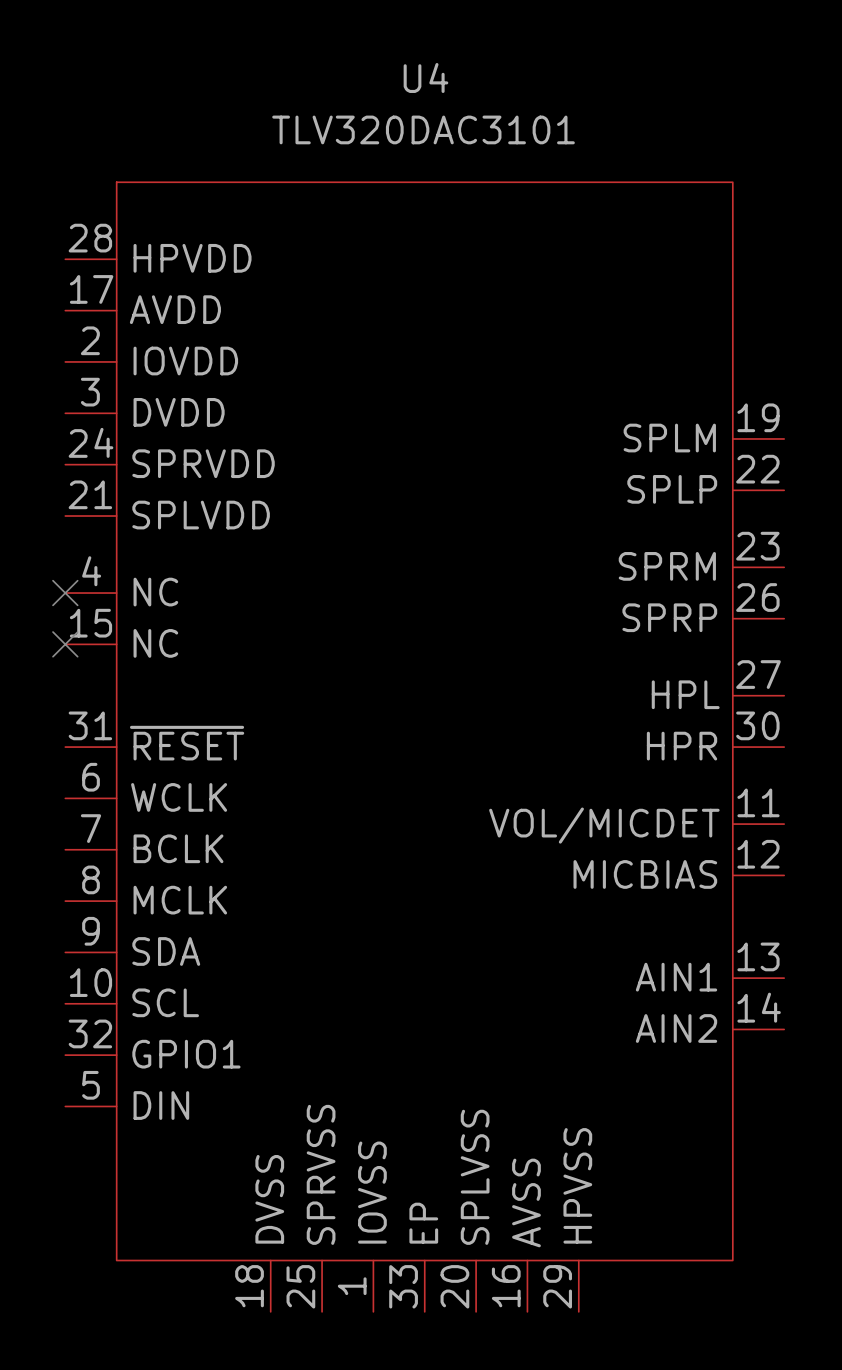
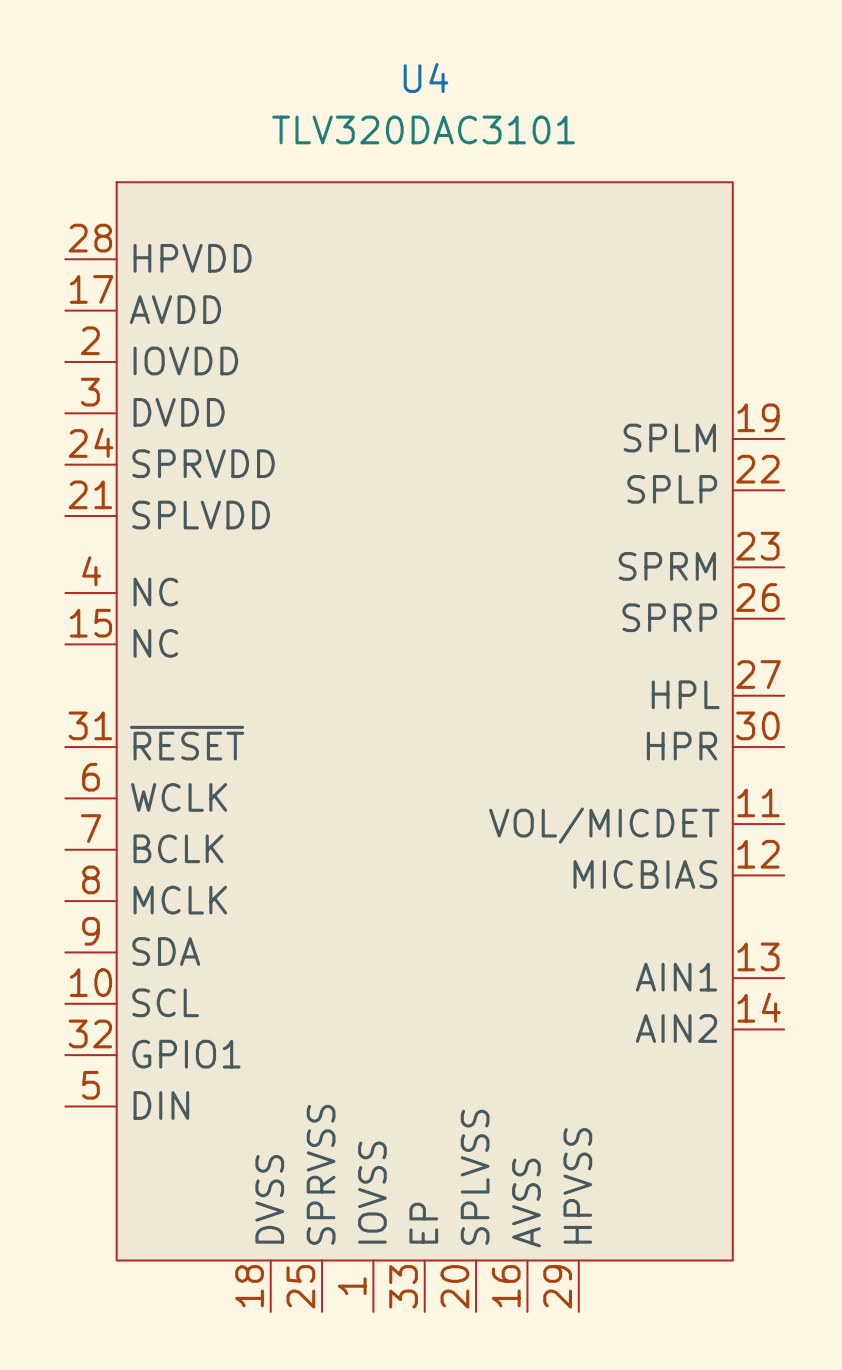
no-connect mark: (65, 593) -> none
no-connect mark: (65, 644) -> none

